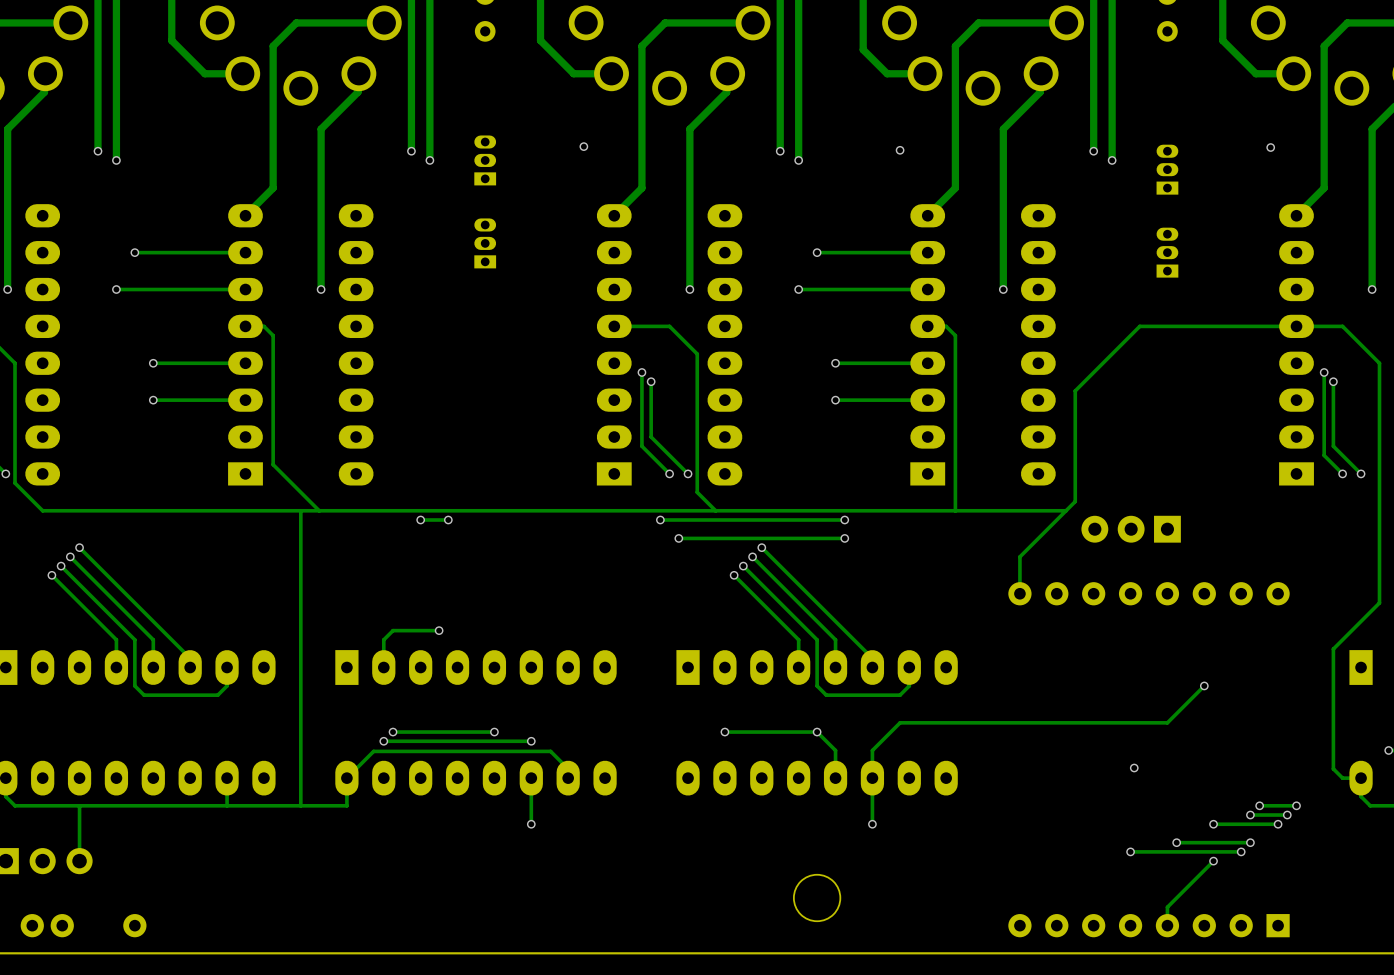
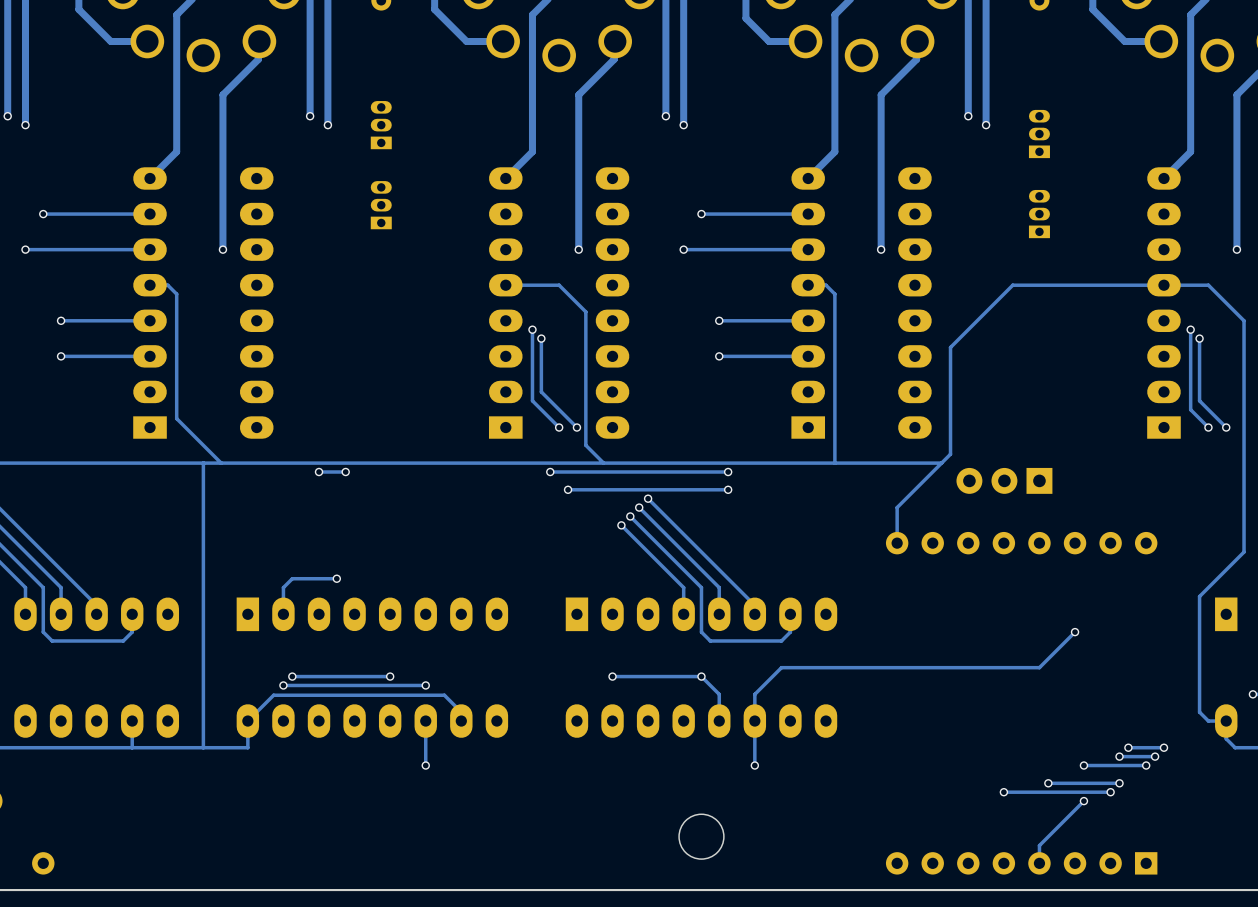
via: (583, 146) -> none
via: (1270, 147) -> none
via: (900, 150) -> none
via: (1134, 768) -> none

